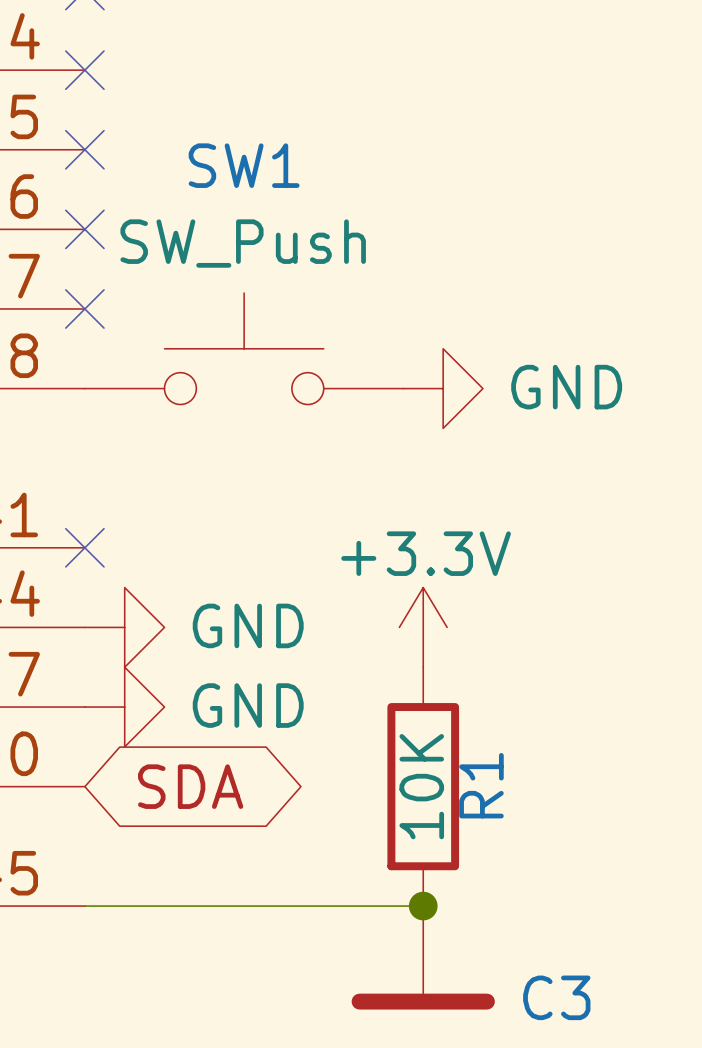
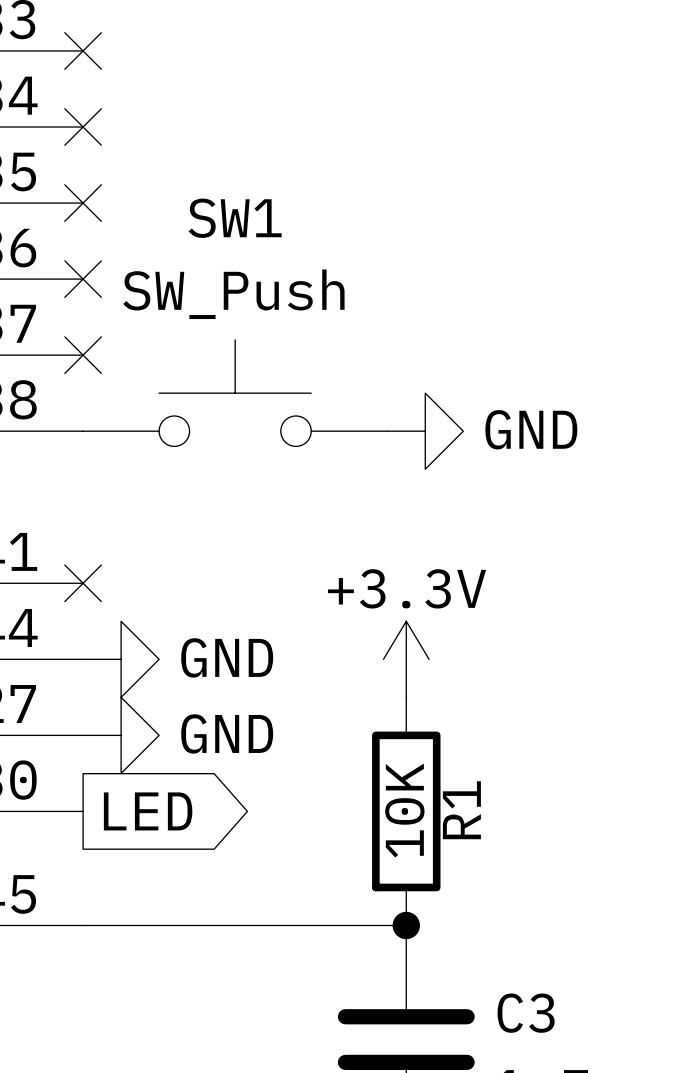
global label shape: bidirectional (190, 786) -> output (148, 811)
global label: SDA (190, 786) -> LED (148, 811)

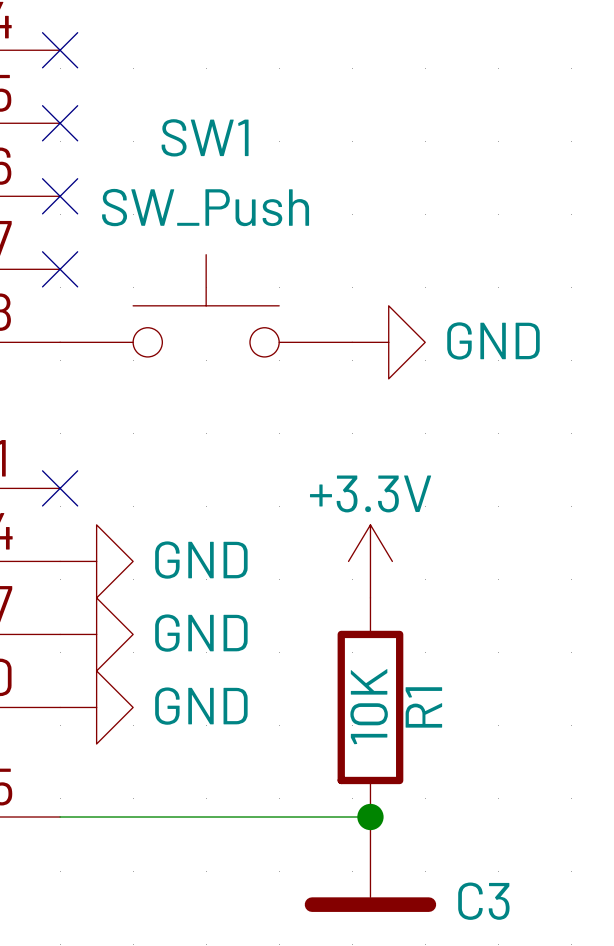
power symbol: none -> GND (96, 707)
global label: LED (148, 811) -> none

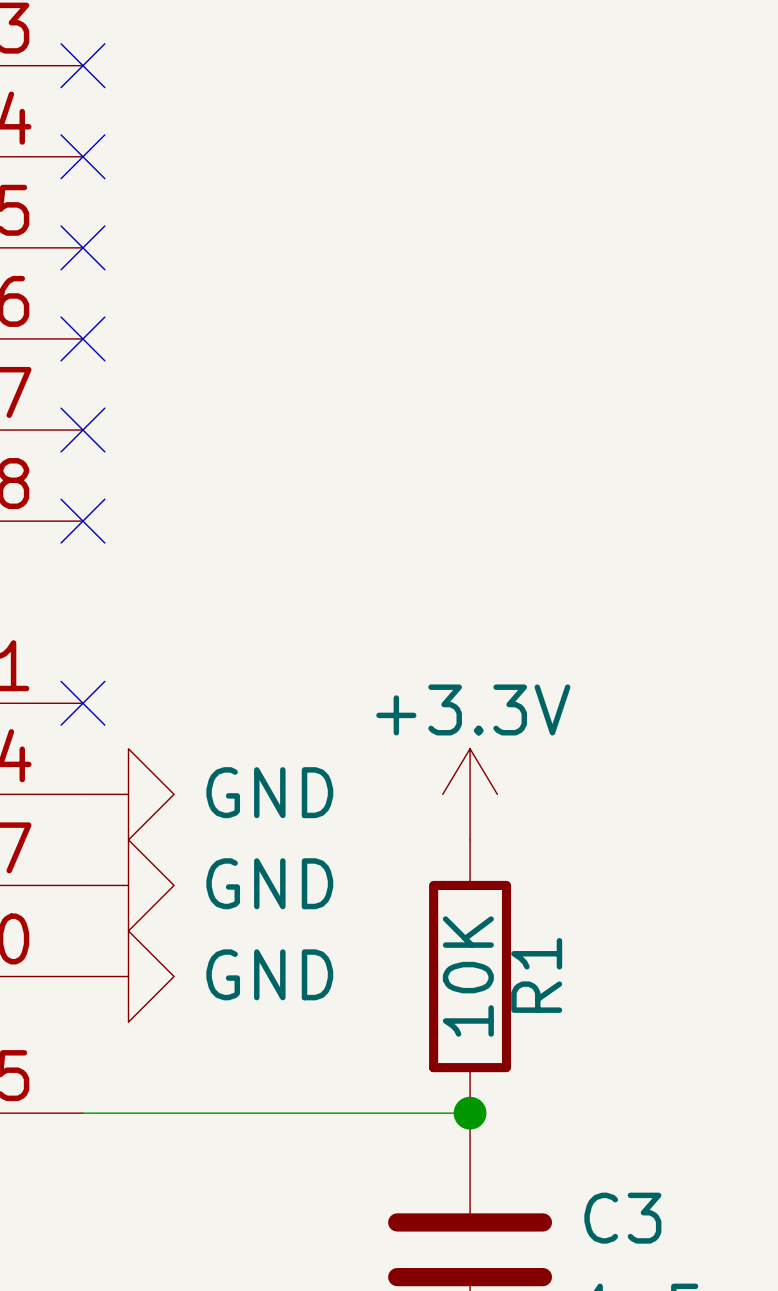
SW1: SW_Push (206, 305) -> none
no-connect mark: none -> (82, 521)
power symbol: GND (388, 342) -> none

